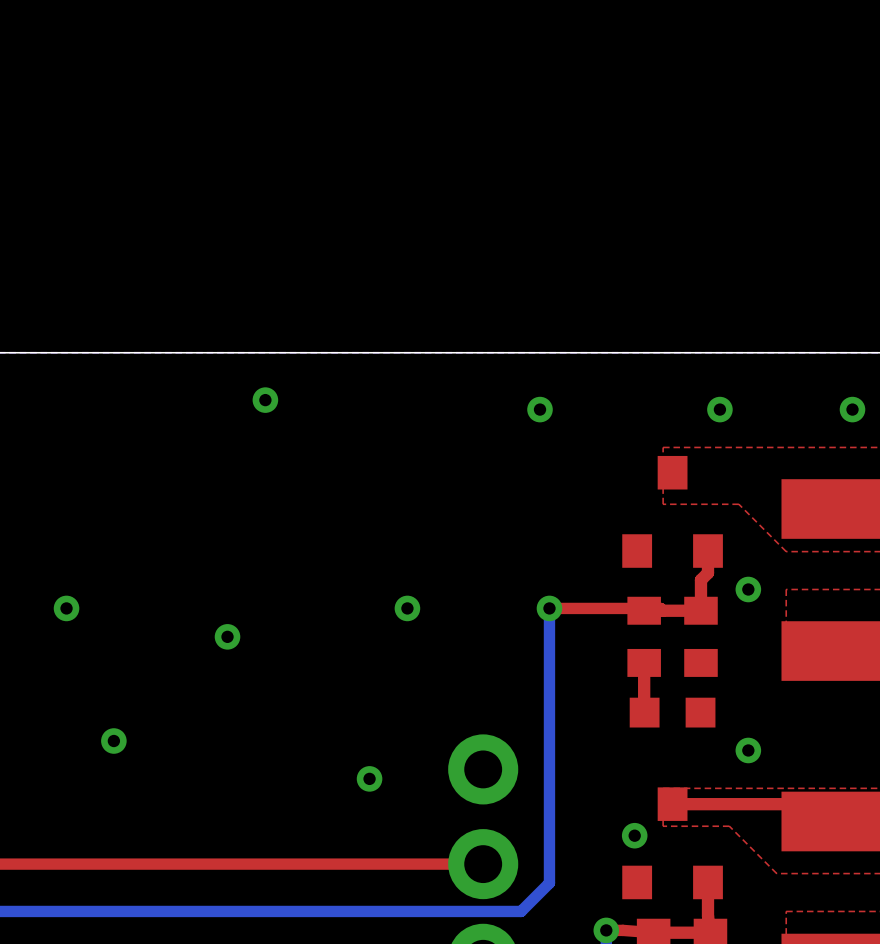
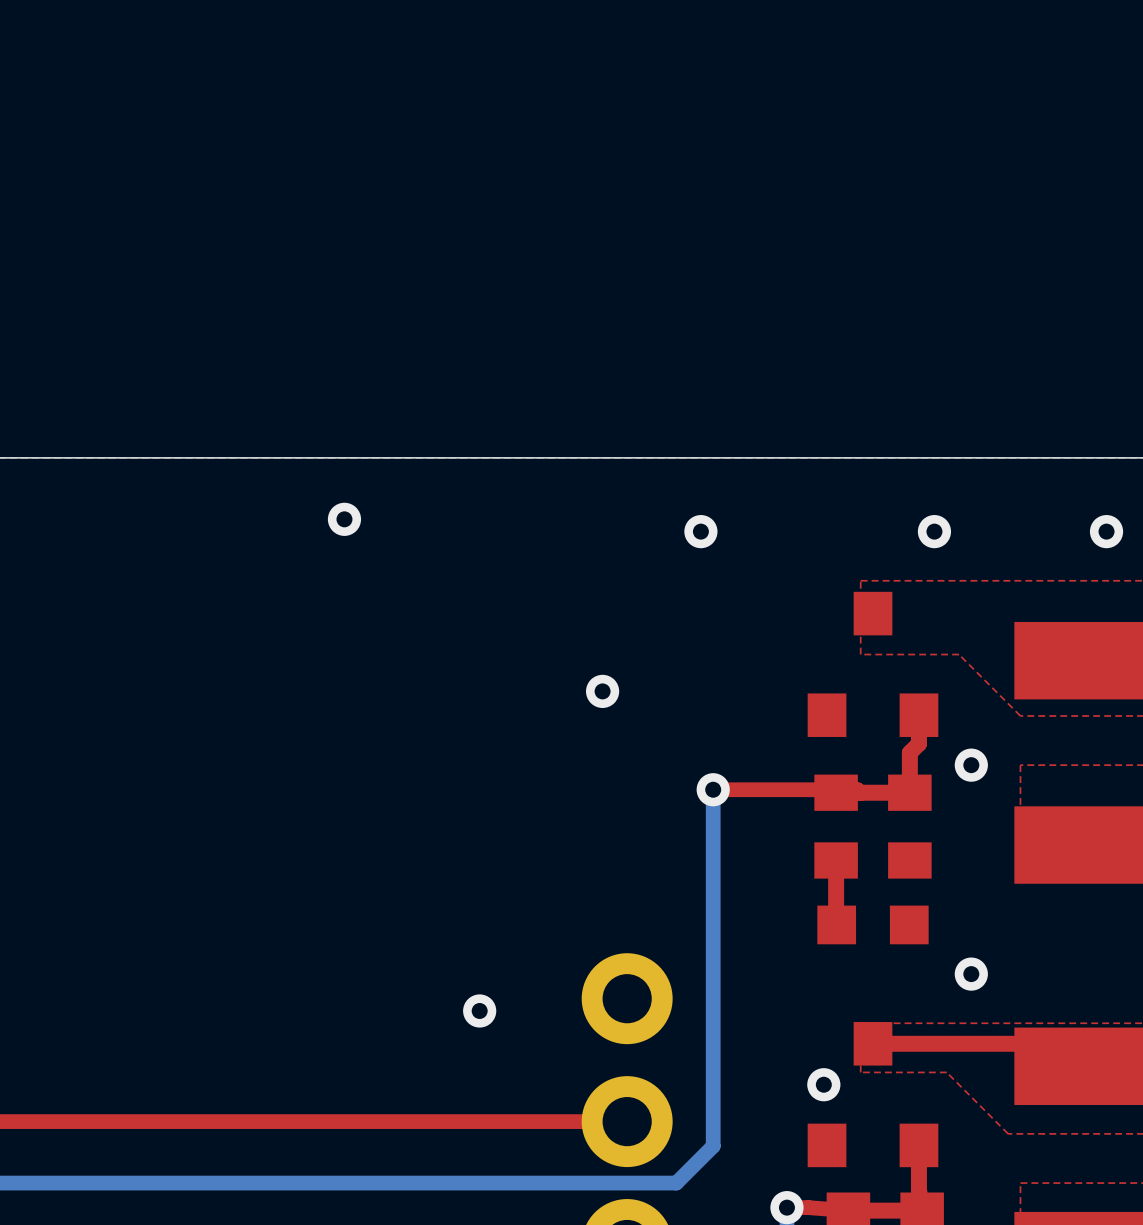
via: (66, 608) -> none
via position: (407, 608) -> (602, 691)
via: (227, 636) -> none
via: (113, 741) -> none

